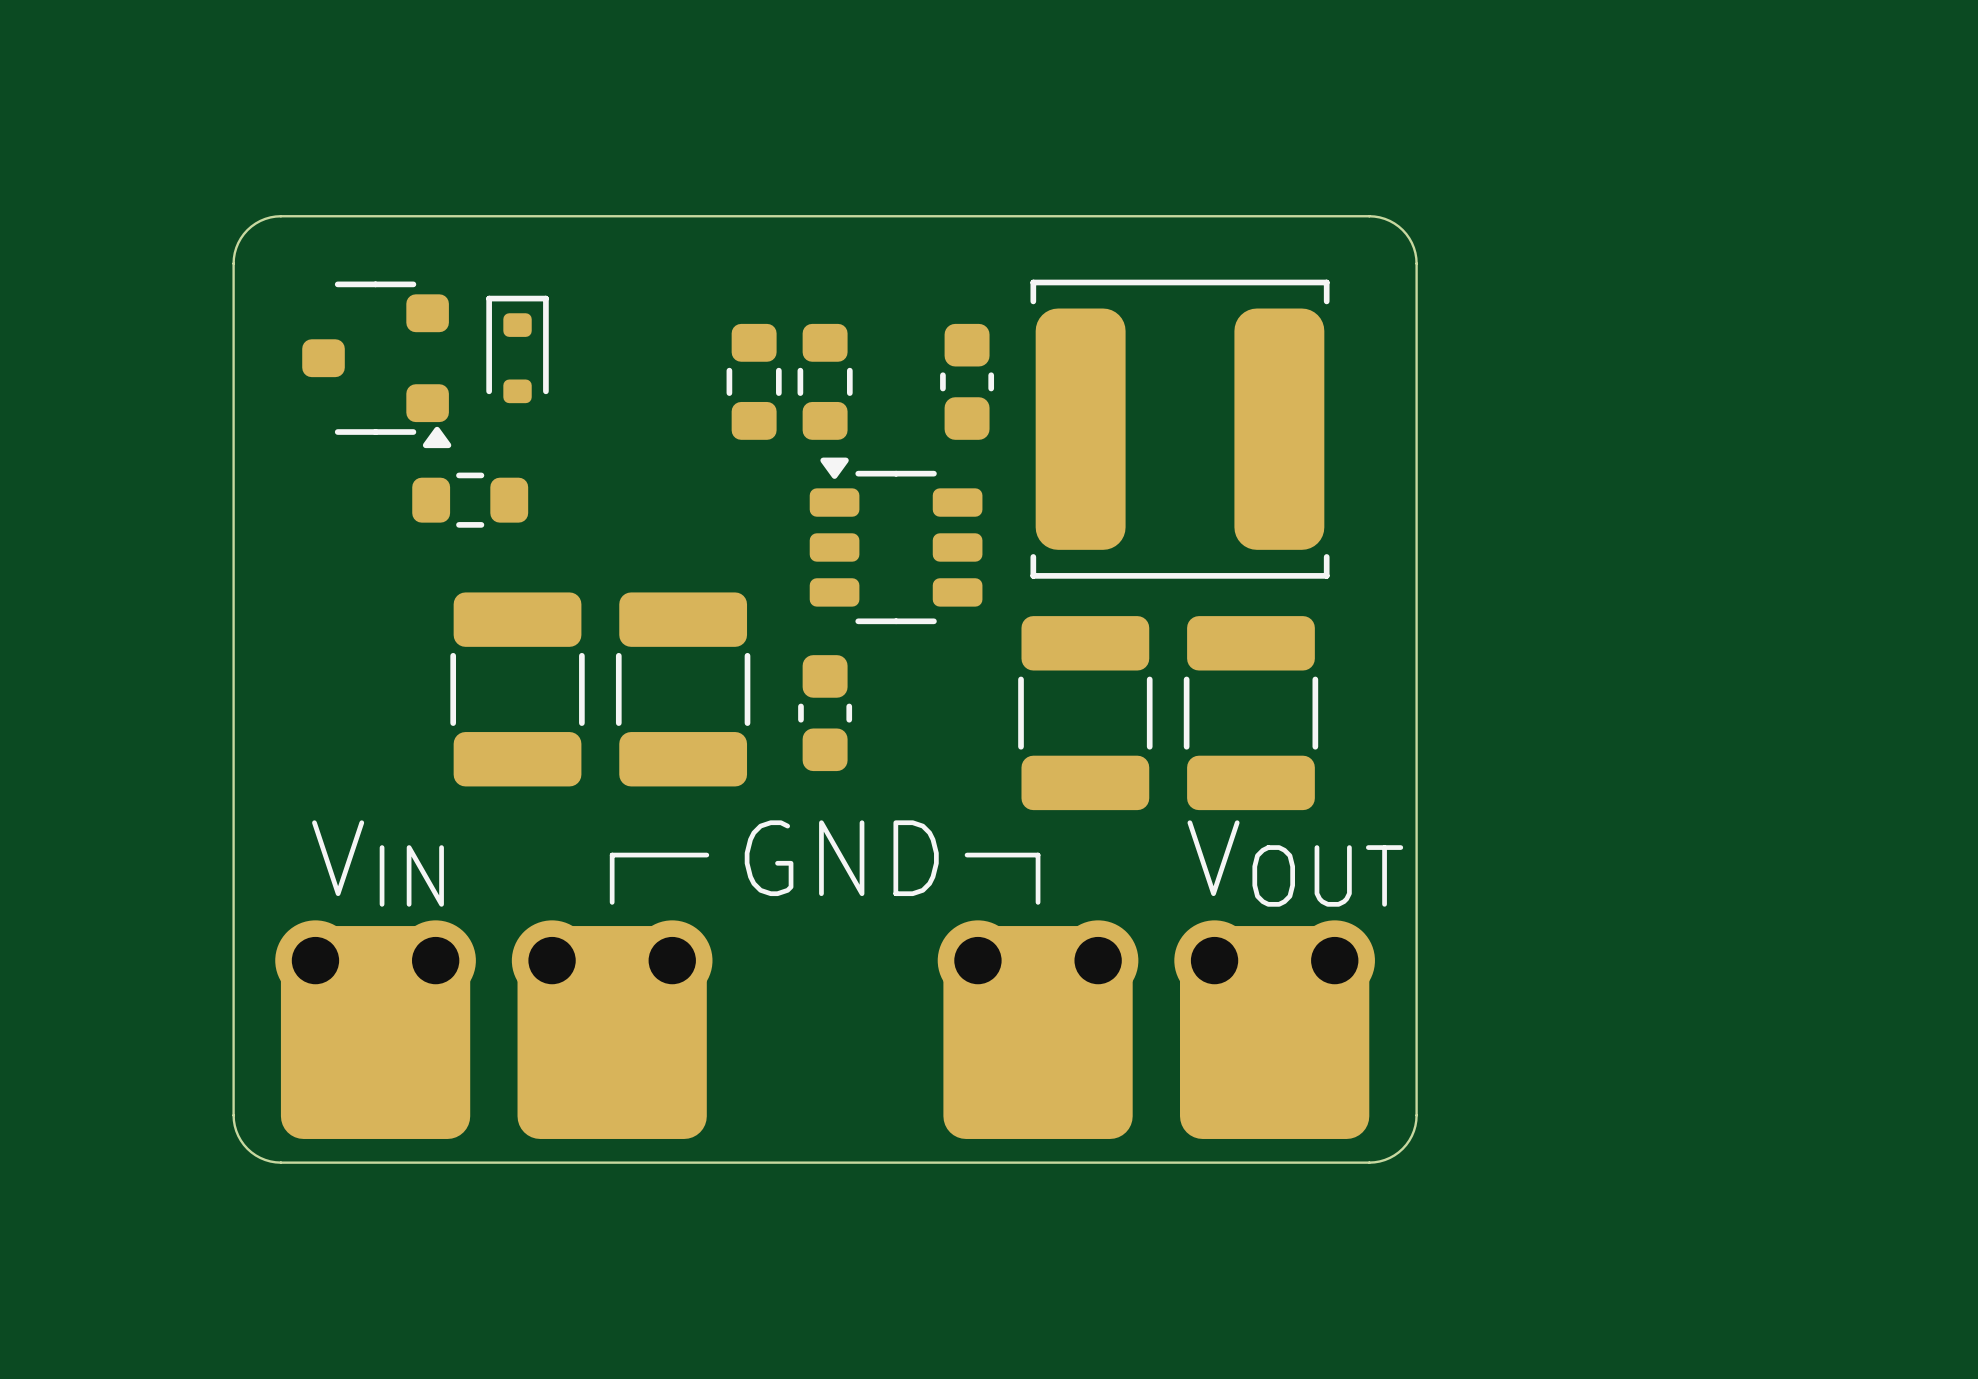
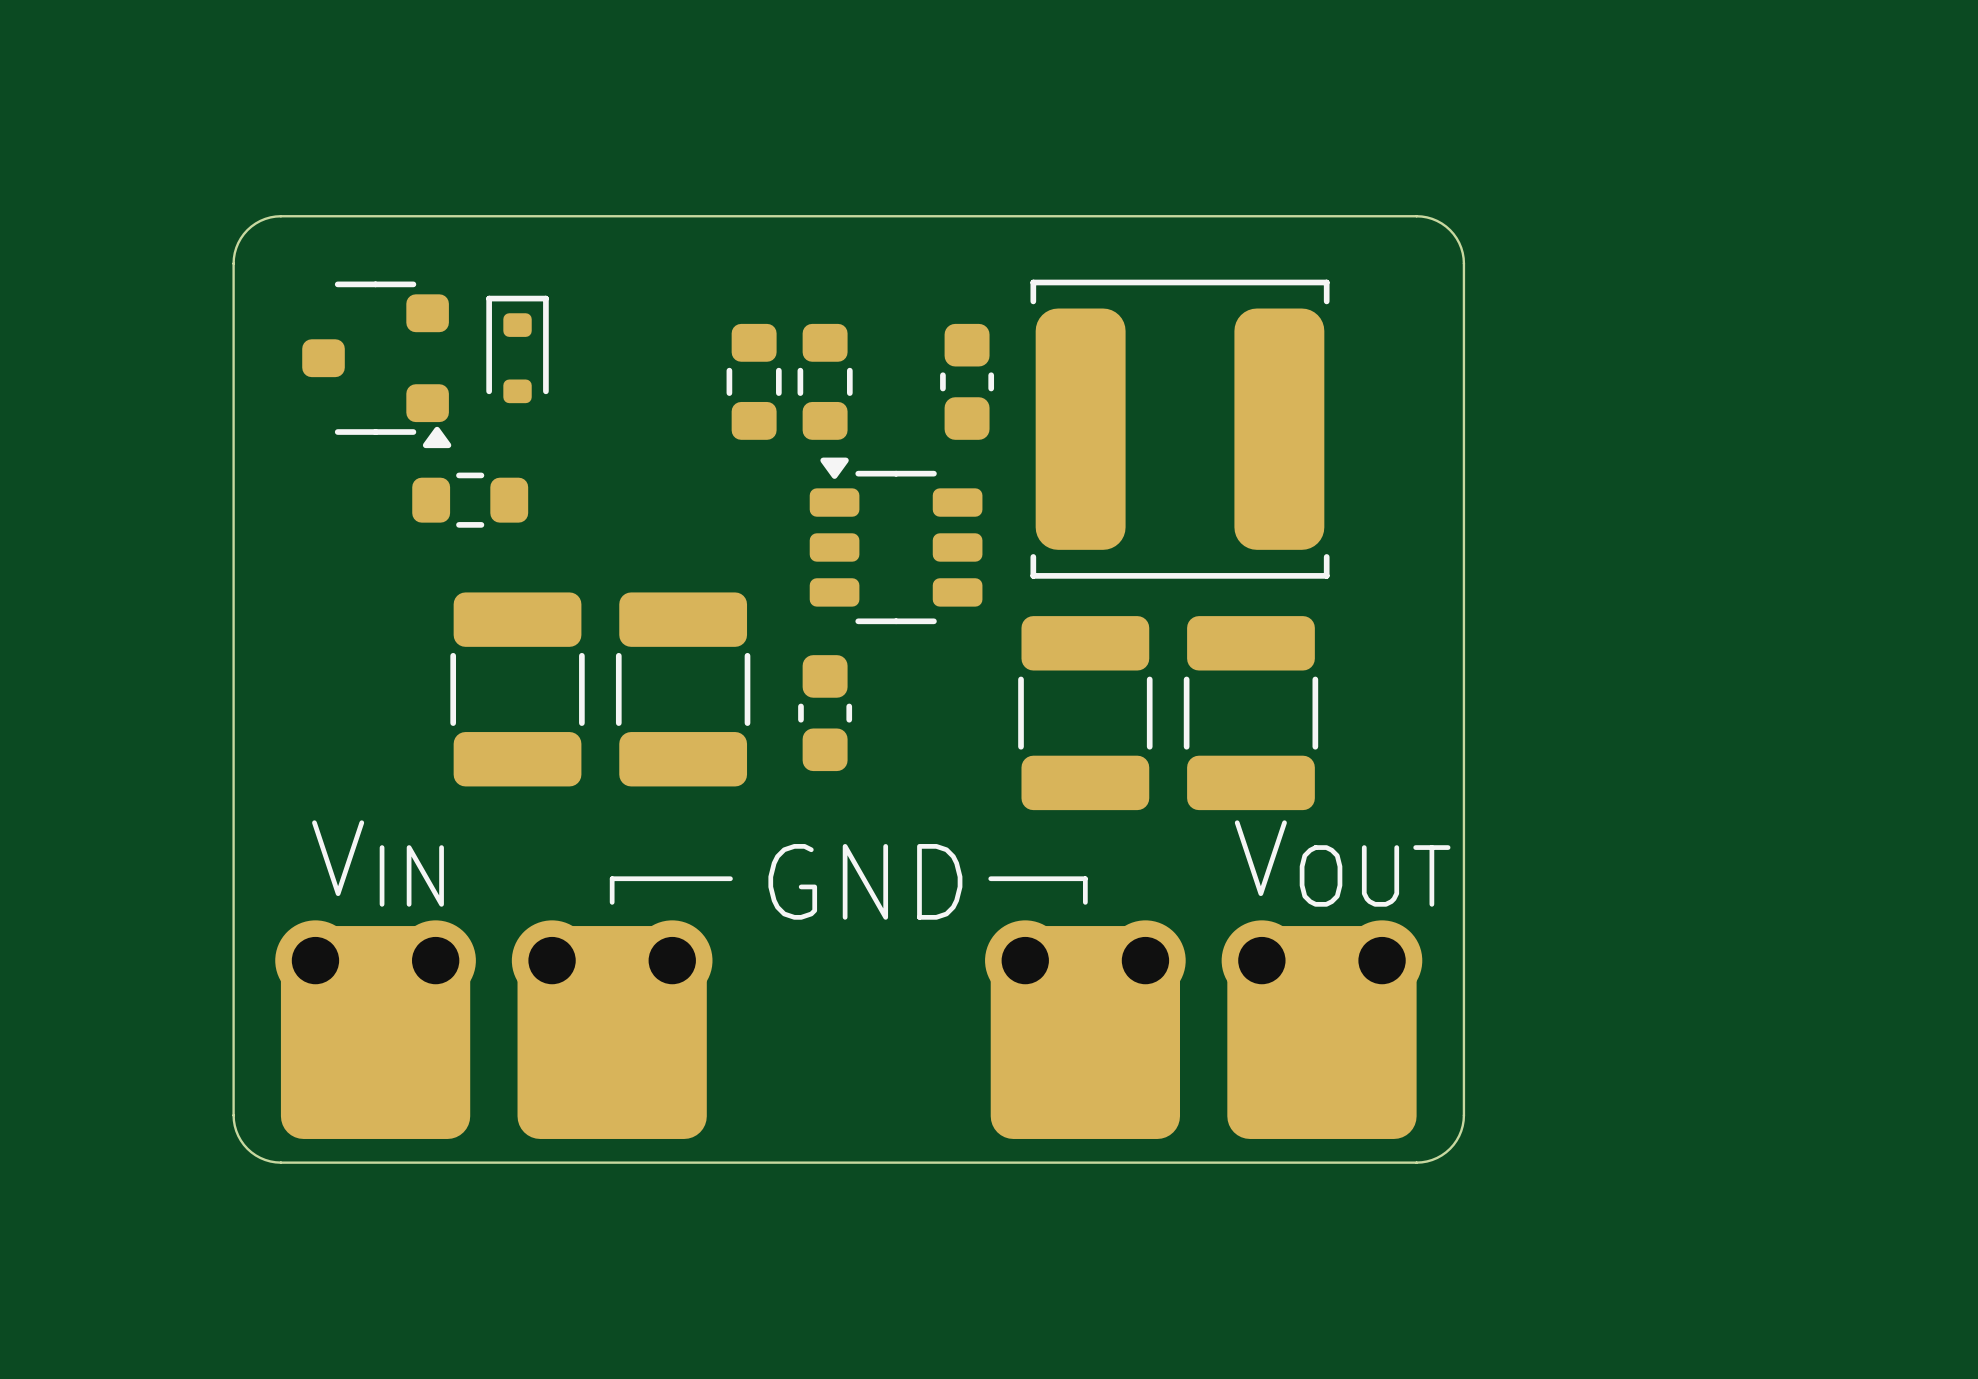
board edge: (1369, 216) (1384, 218) (1402, 230) (1413, 247) (1416, 263) (1416, 1115) (1413, 1130) (1402, 1148) (1389, 1157) (1369, 1162) -> (1369, 216) (1421, 216) (1437, 220) (1450, 230) (1456, 238) (1462, 253) (1463, 263) (1463, 1120) (1461, 1130) (1453, 1144) (1437, 1157) (1421, 1162) (1369, 1162)
line: (706, 855) (612, 855) (612, 878) -> (730, 878) (612, 878)
line: (967, 855) (1038, 855) (1038, 902) -> none
text position: GND (841, 858) -> GND (865, 881)
text position: VOUT (1295, 863) -> VOUT (1342, 863)
line: none -> (990, 878) (1085, 878) (1085, 902)
part position: (1038, 1029) -> (1085, 1029)
part position: (1274, 1029) -> (1321, 1029)

